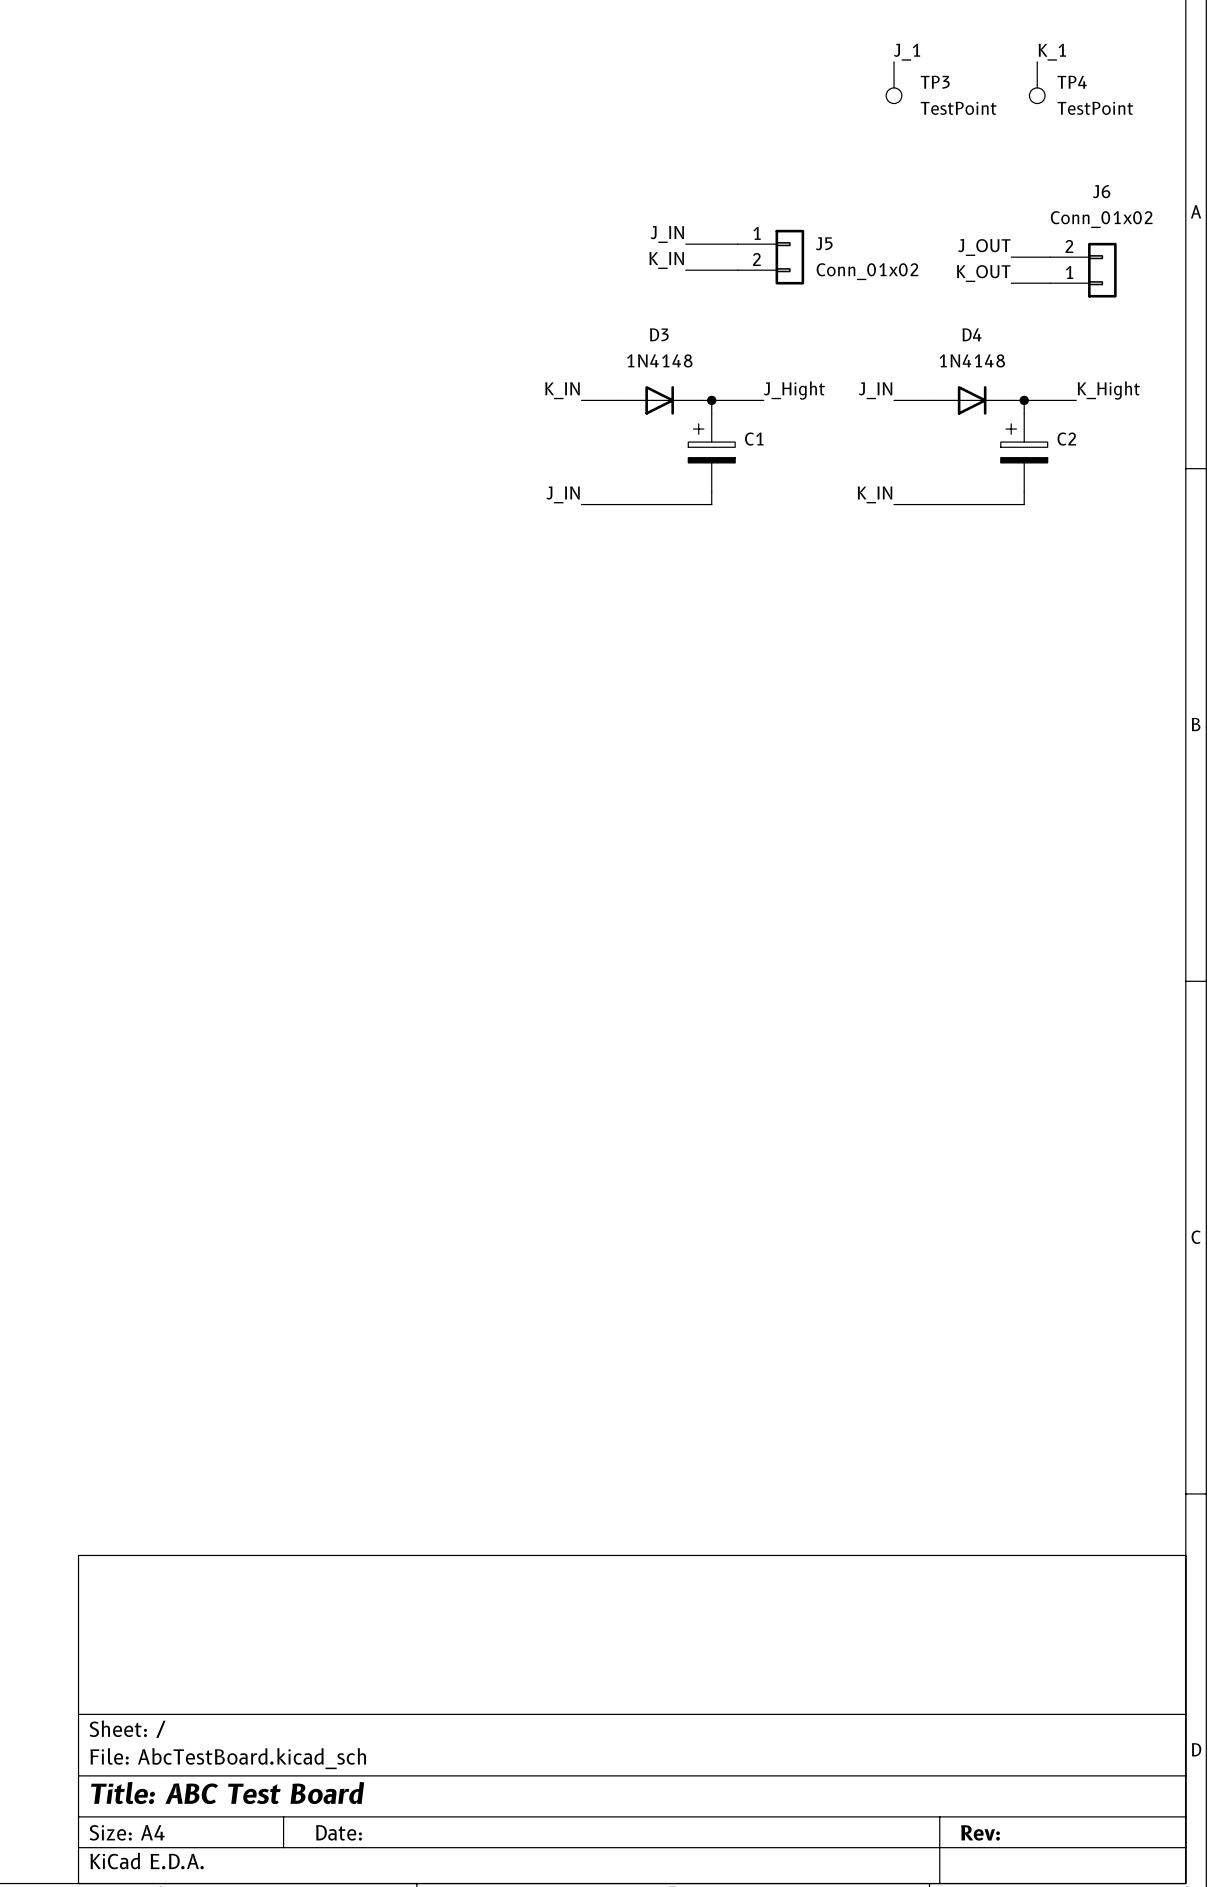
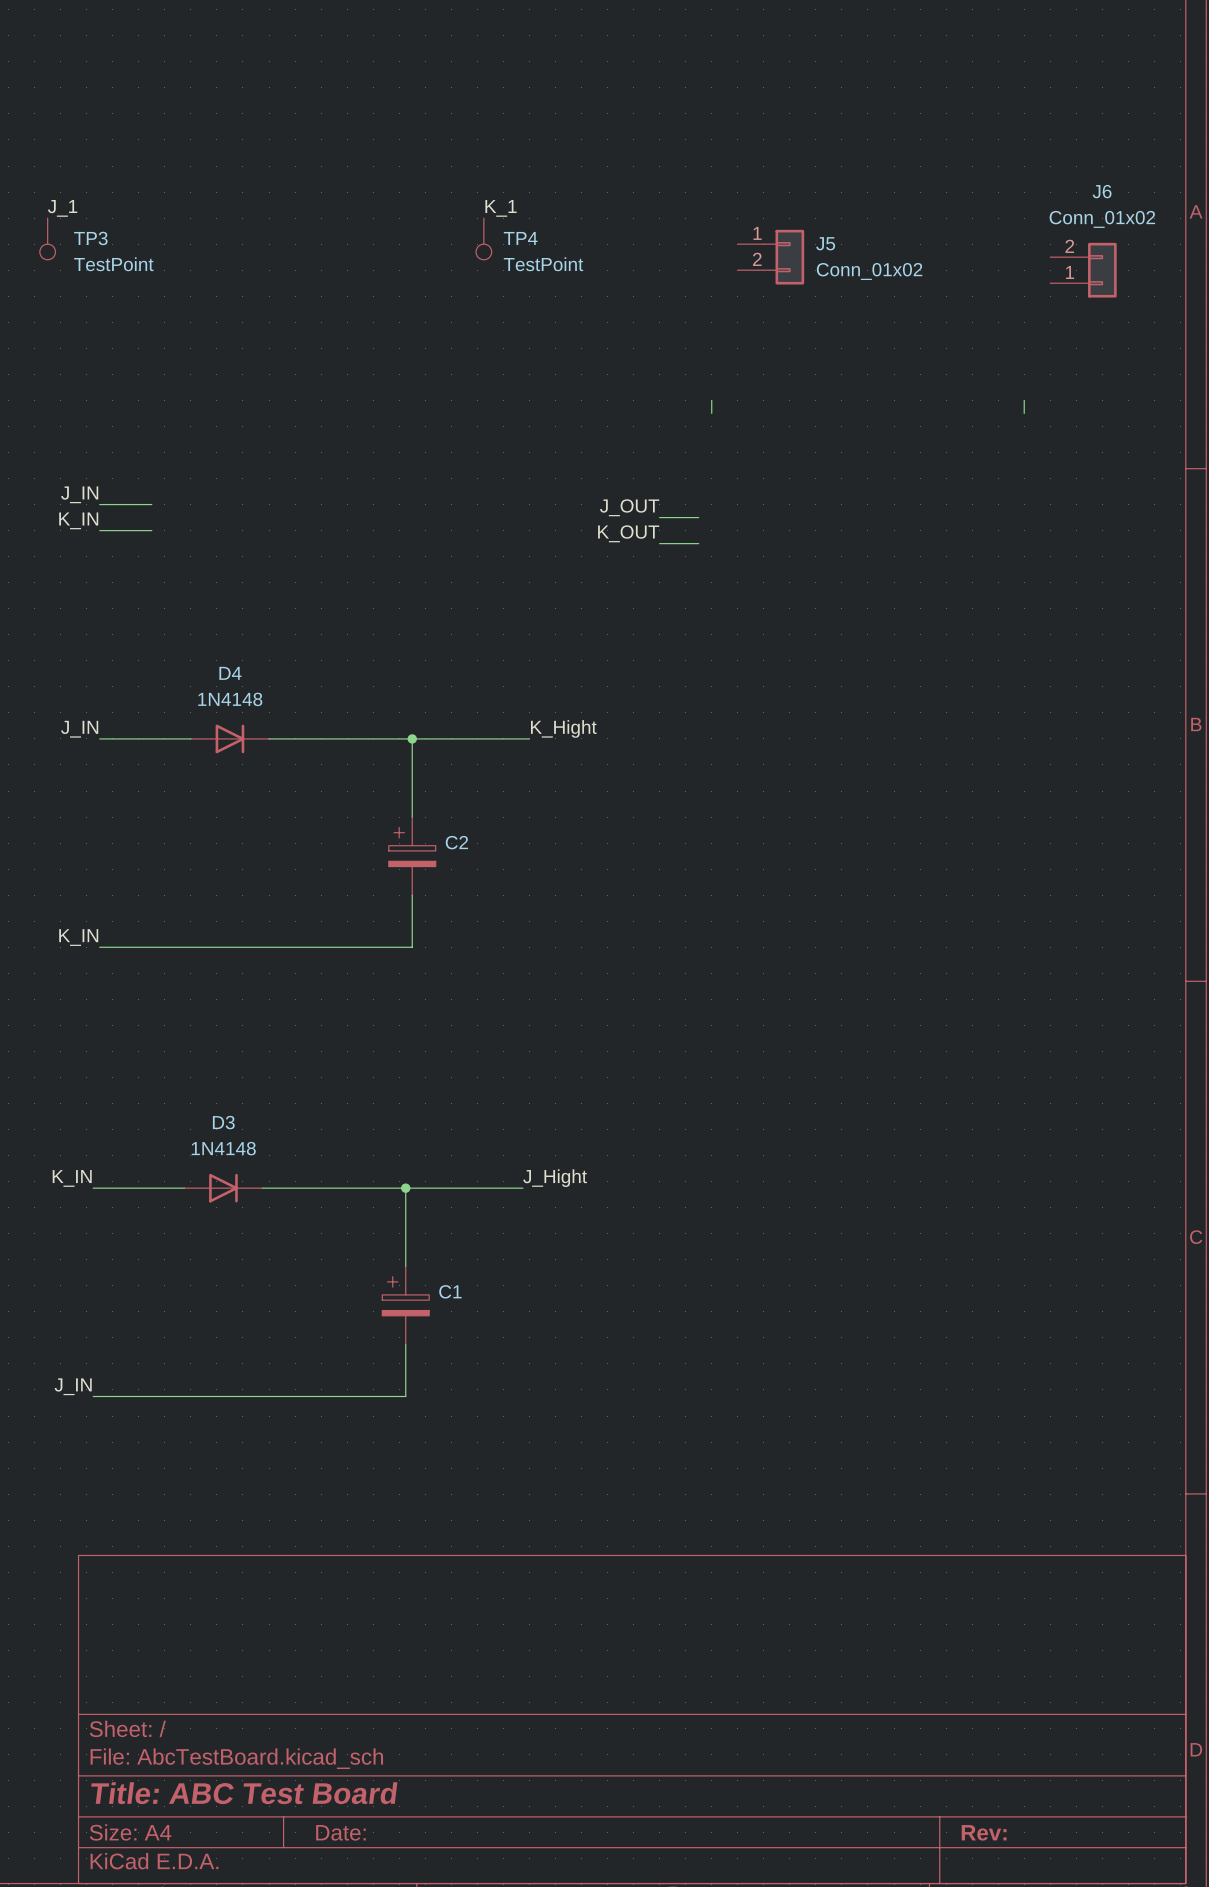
label: J_1 (907, 52) -> none
label: K_1 (1052, 52) -> none
TP3 position: (894, 82) -> (47, 238)
TP4 position: (1037, 82) -> (483, 238)
label: none -> J_1 (62, 208)
label: none -> K_1 (501, 208)
label: J_IN (667, 234) -> none
wire: (685, 244) (737, 244) -> none
label: J_OUT (984, 247) -> none
wire: (1011, 257) (1050, 257) -> none
label: K_IN (666, 260) -> none
wire: (685, 270) (737, 270) -> none
label: K_OUT (983, 273) -> none
wire: (1011, 283) (1050, 283) -> none
label: K_IN (562, 390) -> none
label: J_Hight (794, 390) -> none
label: J_IN (875, 390) -> none
label: K_Hight (1108, 390) -> none
wire: (581, 400) (620, 400) -> (659, 517) (698, 517)
D3 position: (659, 400) -> (223, 1188)
wire: (698, 400) (763, 400) -> none
junction: (711, 400) -> none
wire: (894, 400) (933, 400) -> none
D4 position: (972, 400) -> (229, 738)
wire: (1011, 400) (1076, 400) -> none
junction: (1024, 400) -> none
C1 position: (711, 452) -> (405, 1305)
C2 position: (1024, 452) -> (412, 856)
wire: (711, 491) (711, 504) (581, 504) -> none
wire: (1024, 491) (1024, 504) (894, 504) -> none
label: none -> J_IN (79, 494)
label: J_IN (563, 494) -> none
label: K_IN (874, 494) -> none
wire: none -> (99, 504) (151, 504)
label: none -> J_OUT (629, 507)
label: none -> K_IN (78, 520)
wire: none -> (99, 530) (151, 530)
label: none -> K_OUT (628, 533)
wire: none -> (659, 543) (698, 543)
label: none -> J_IN (79, 729)
label: none -> K_Hight (563, 728)
wire: none -> (99, 738) (190, 738)
wire: none -> (269, 738) (529, 738)
wire: none -> (412, 738) (412, 817)
junction: none -> (412, 738)
wire: none -> (412, 895) (412, 947) (99, 947)
label: none -> K_IN (78, 937)
label: none -> K_IN (72, 1178)
label: none -> J_Hight (555, 1178)
wire: none -> (93, 1188) (184, 1188)
wire: none -> (262, 1188) (522, 1188)
wire: none -> (405, 1188) (405, 1266)
junction: none -> (405, 1188)
wire: none -> (405, 1344) (405, 1396) (93, 1396)
label: none -> J_IN (73, 1386)

